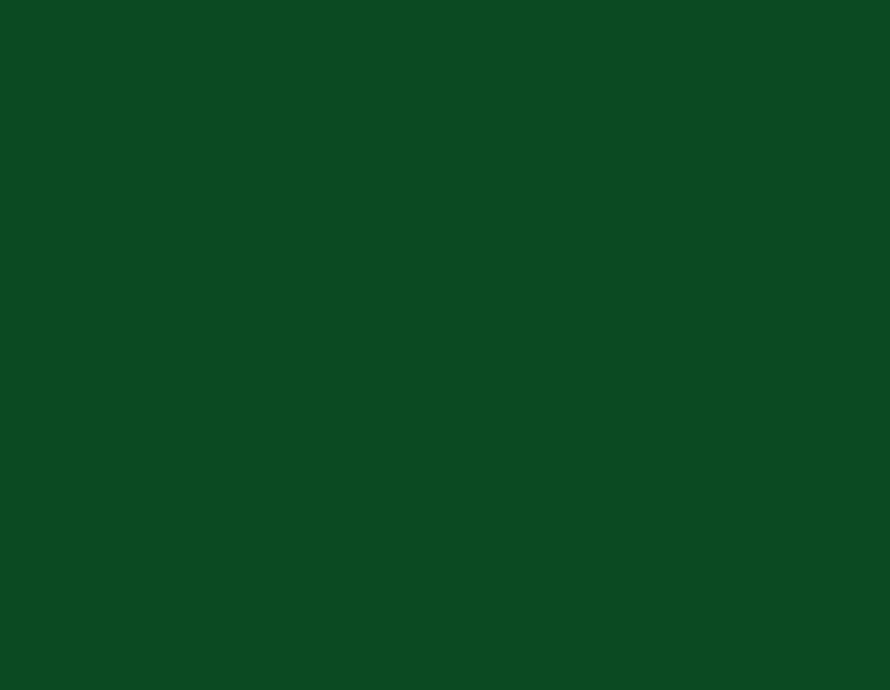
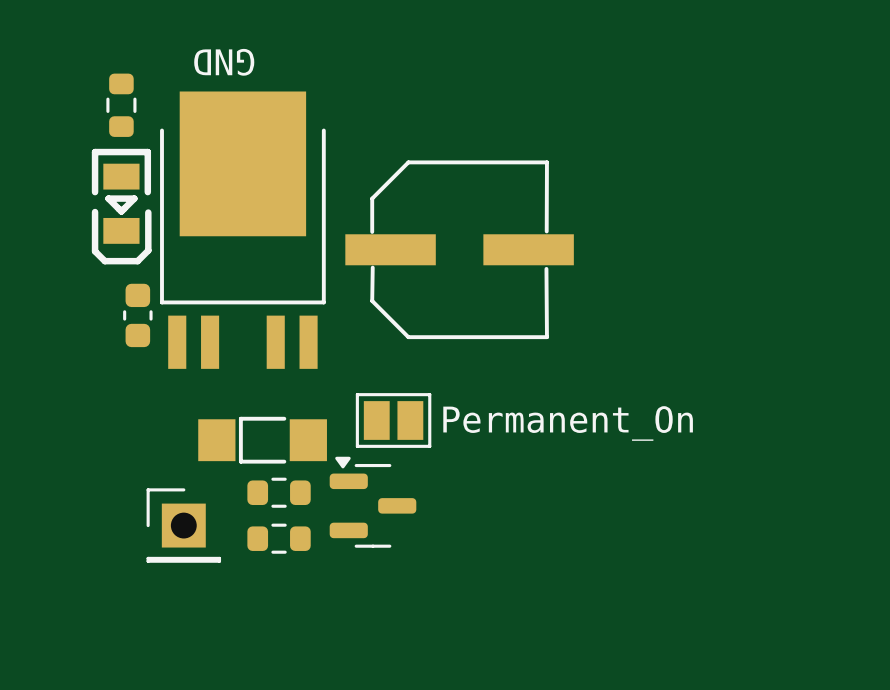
text: none -> GND (224, 62)
part: none -> (121, 105)
part: none -> (121, 206)
part: none -> (242, 230)
part: none -> (459, 249)
part: none -> (137, 315)
part: none -> (393, 420)
text: none -> Permanent_On (568, 423)
part: none -> (262, 440)
part: none -> (279, 492)
part: none -> (373, 502)
part: none -> (183, 525)
part: none -> (279, 538)

